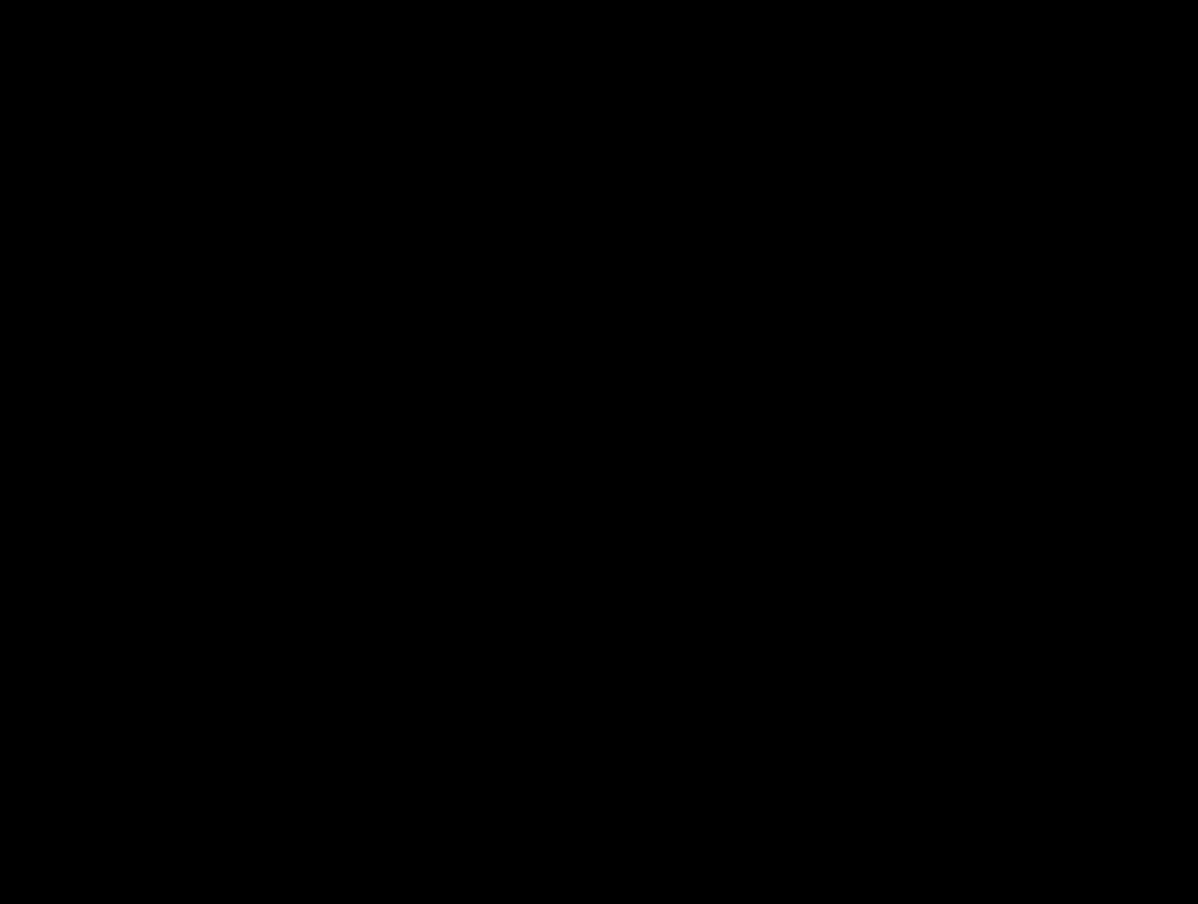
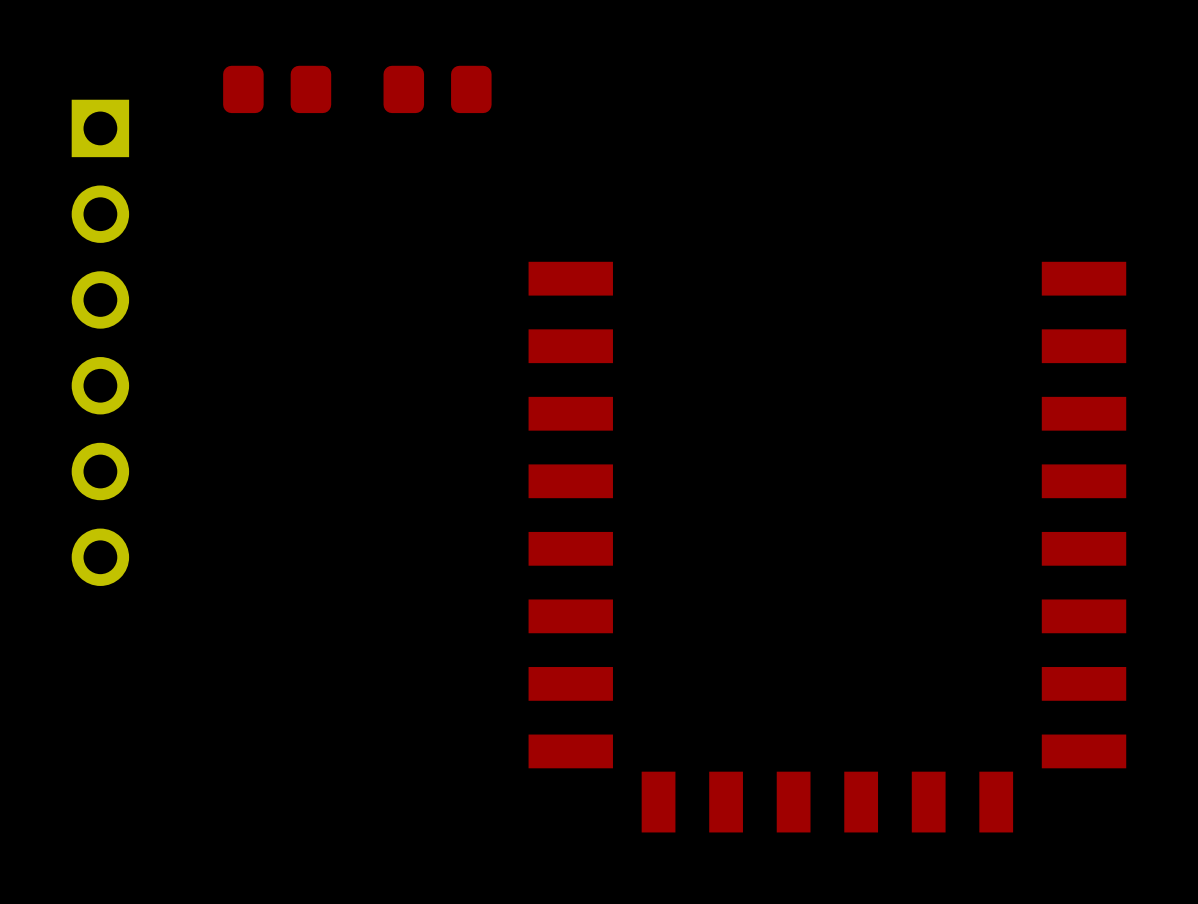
part: none -> (277, 89)
part: none -> (437, 89)
part: none -> (100, 342)
part: none -> (827, 547)

